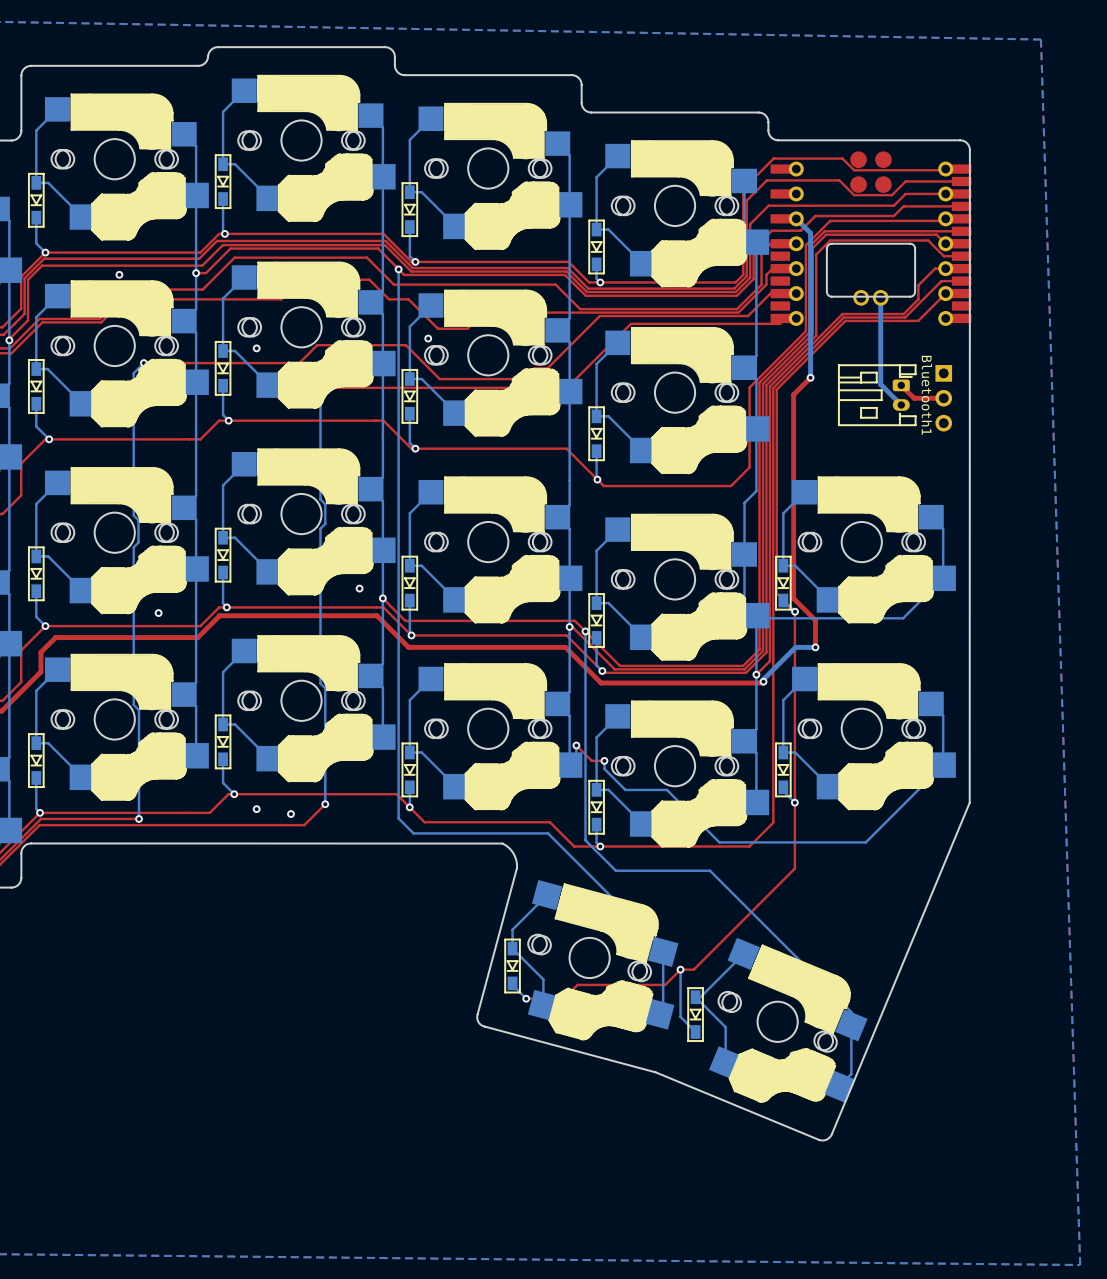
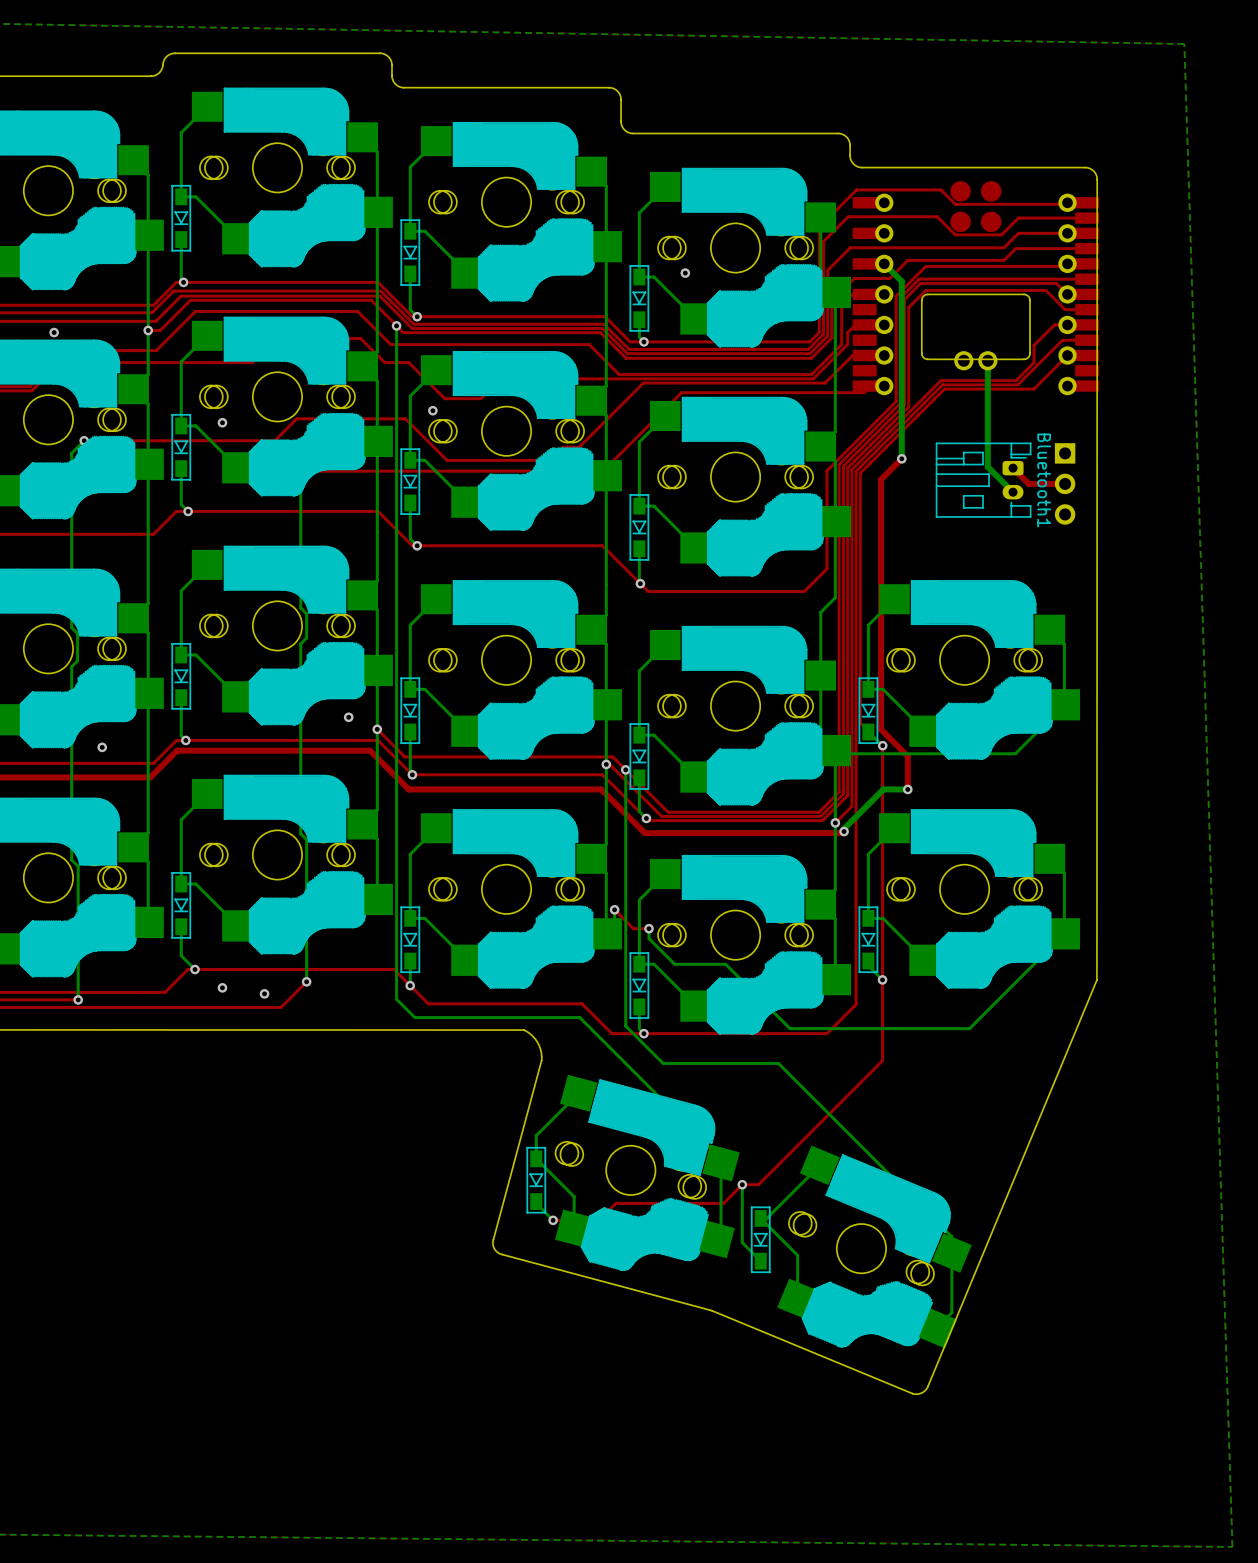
via: none -> (685, 273)

